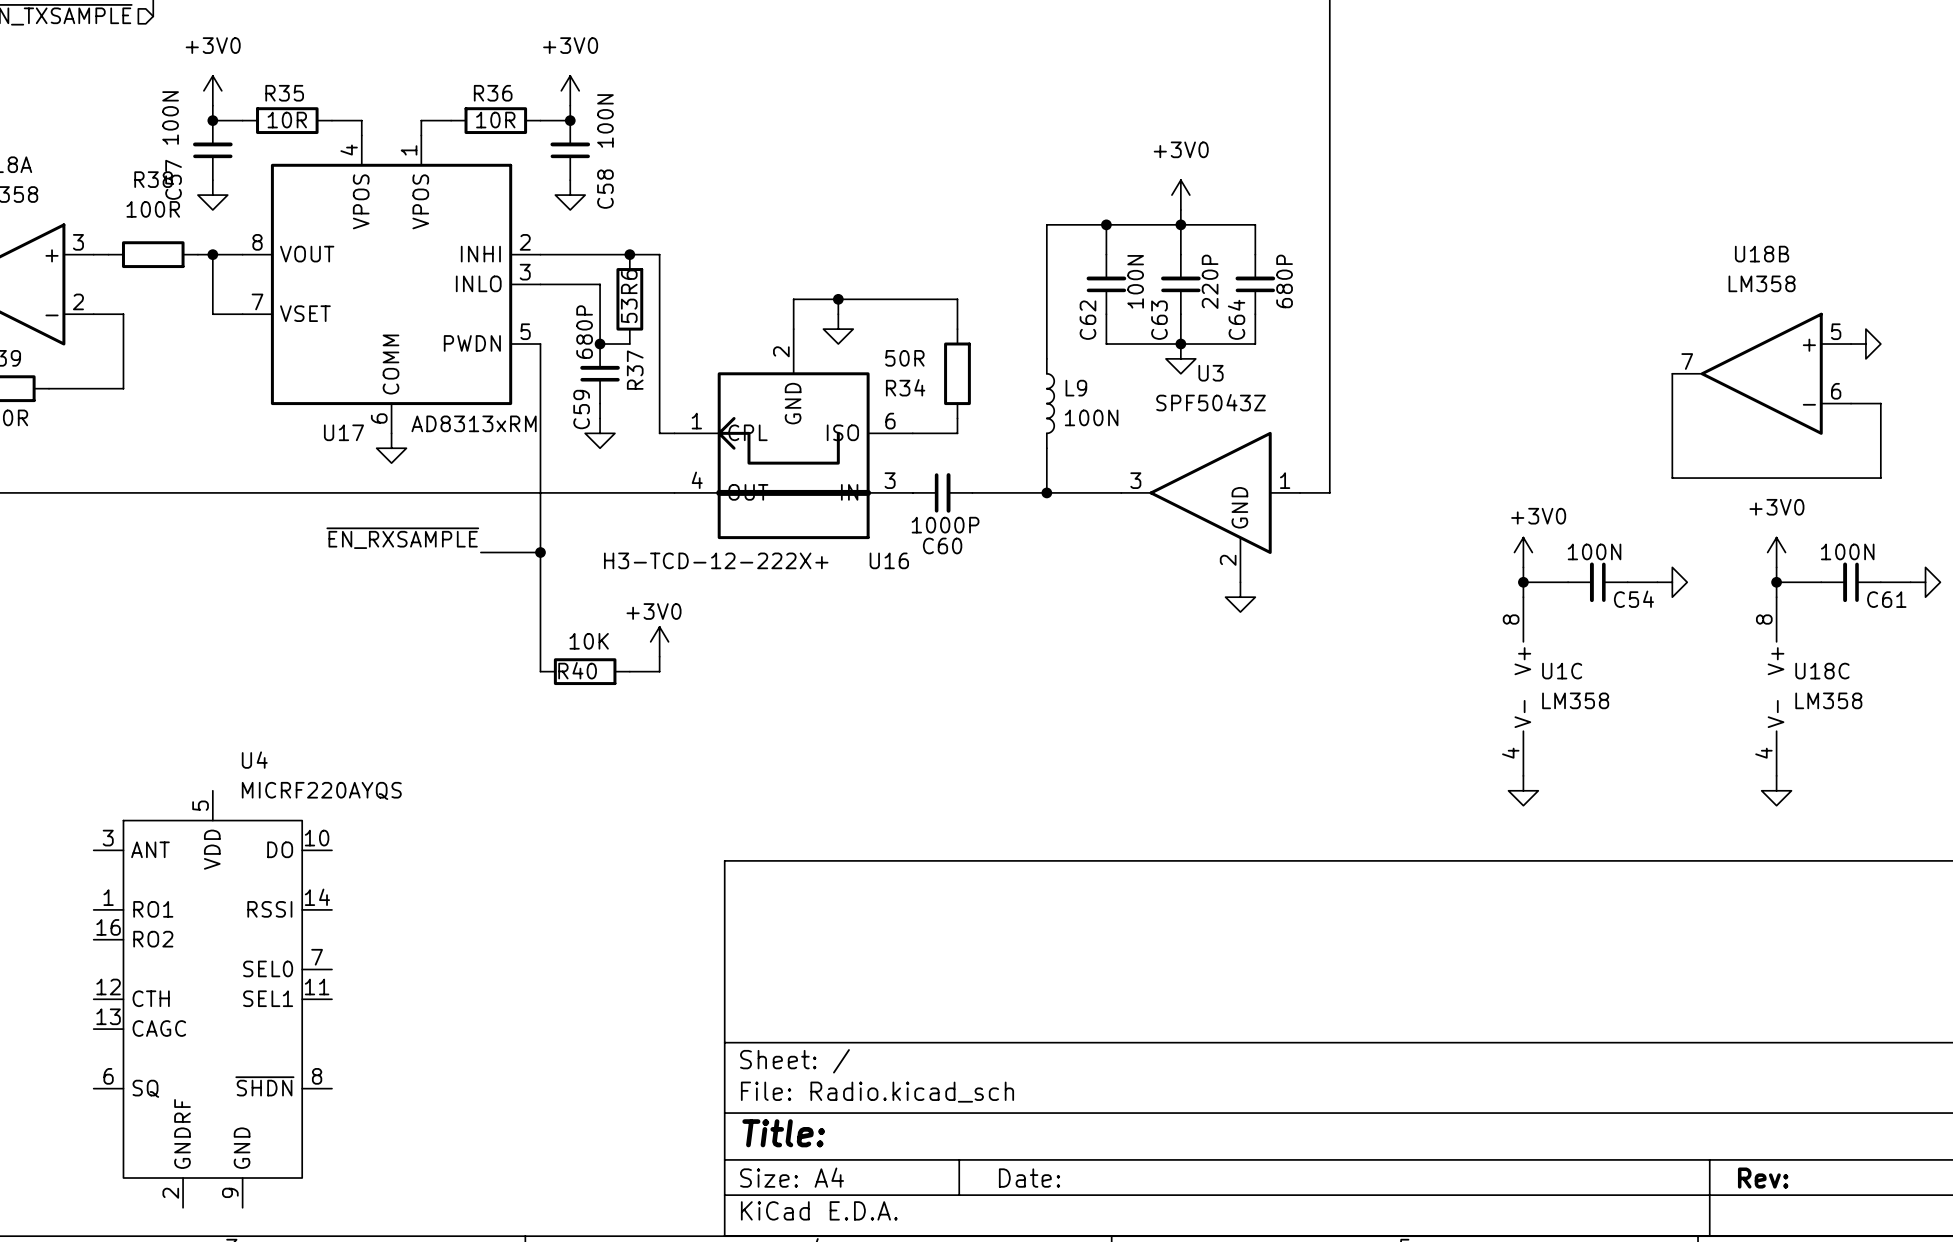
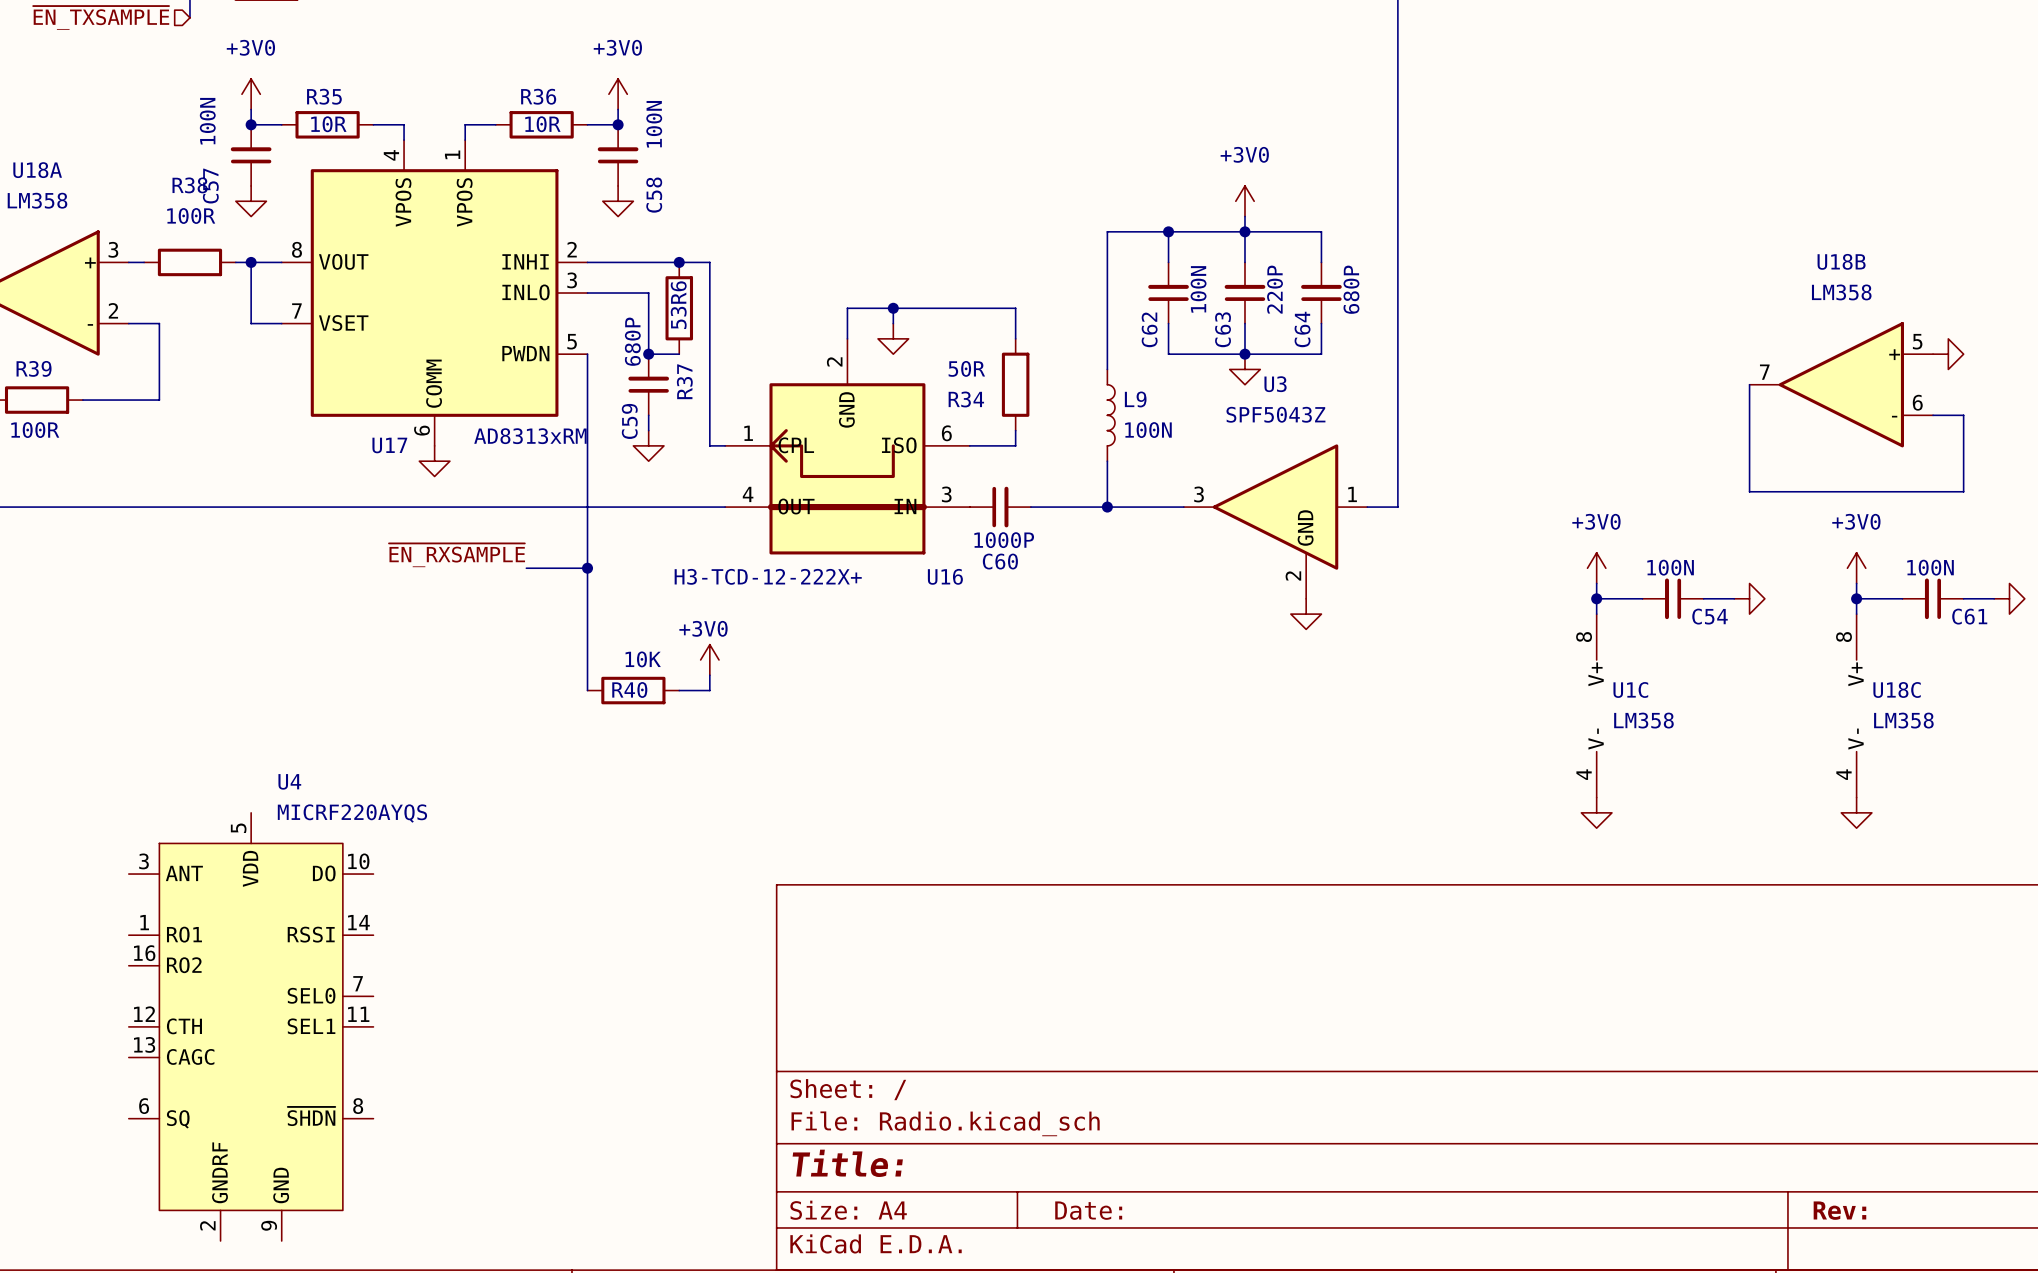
power symbol text position: +3V0 (1538, 516) -> +3V0 (1596, 521)

